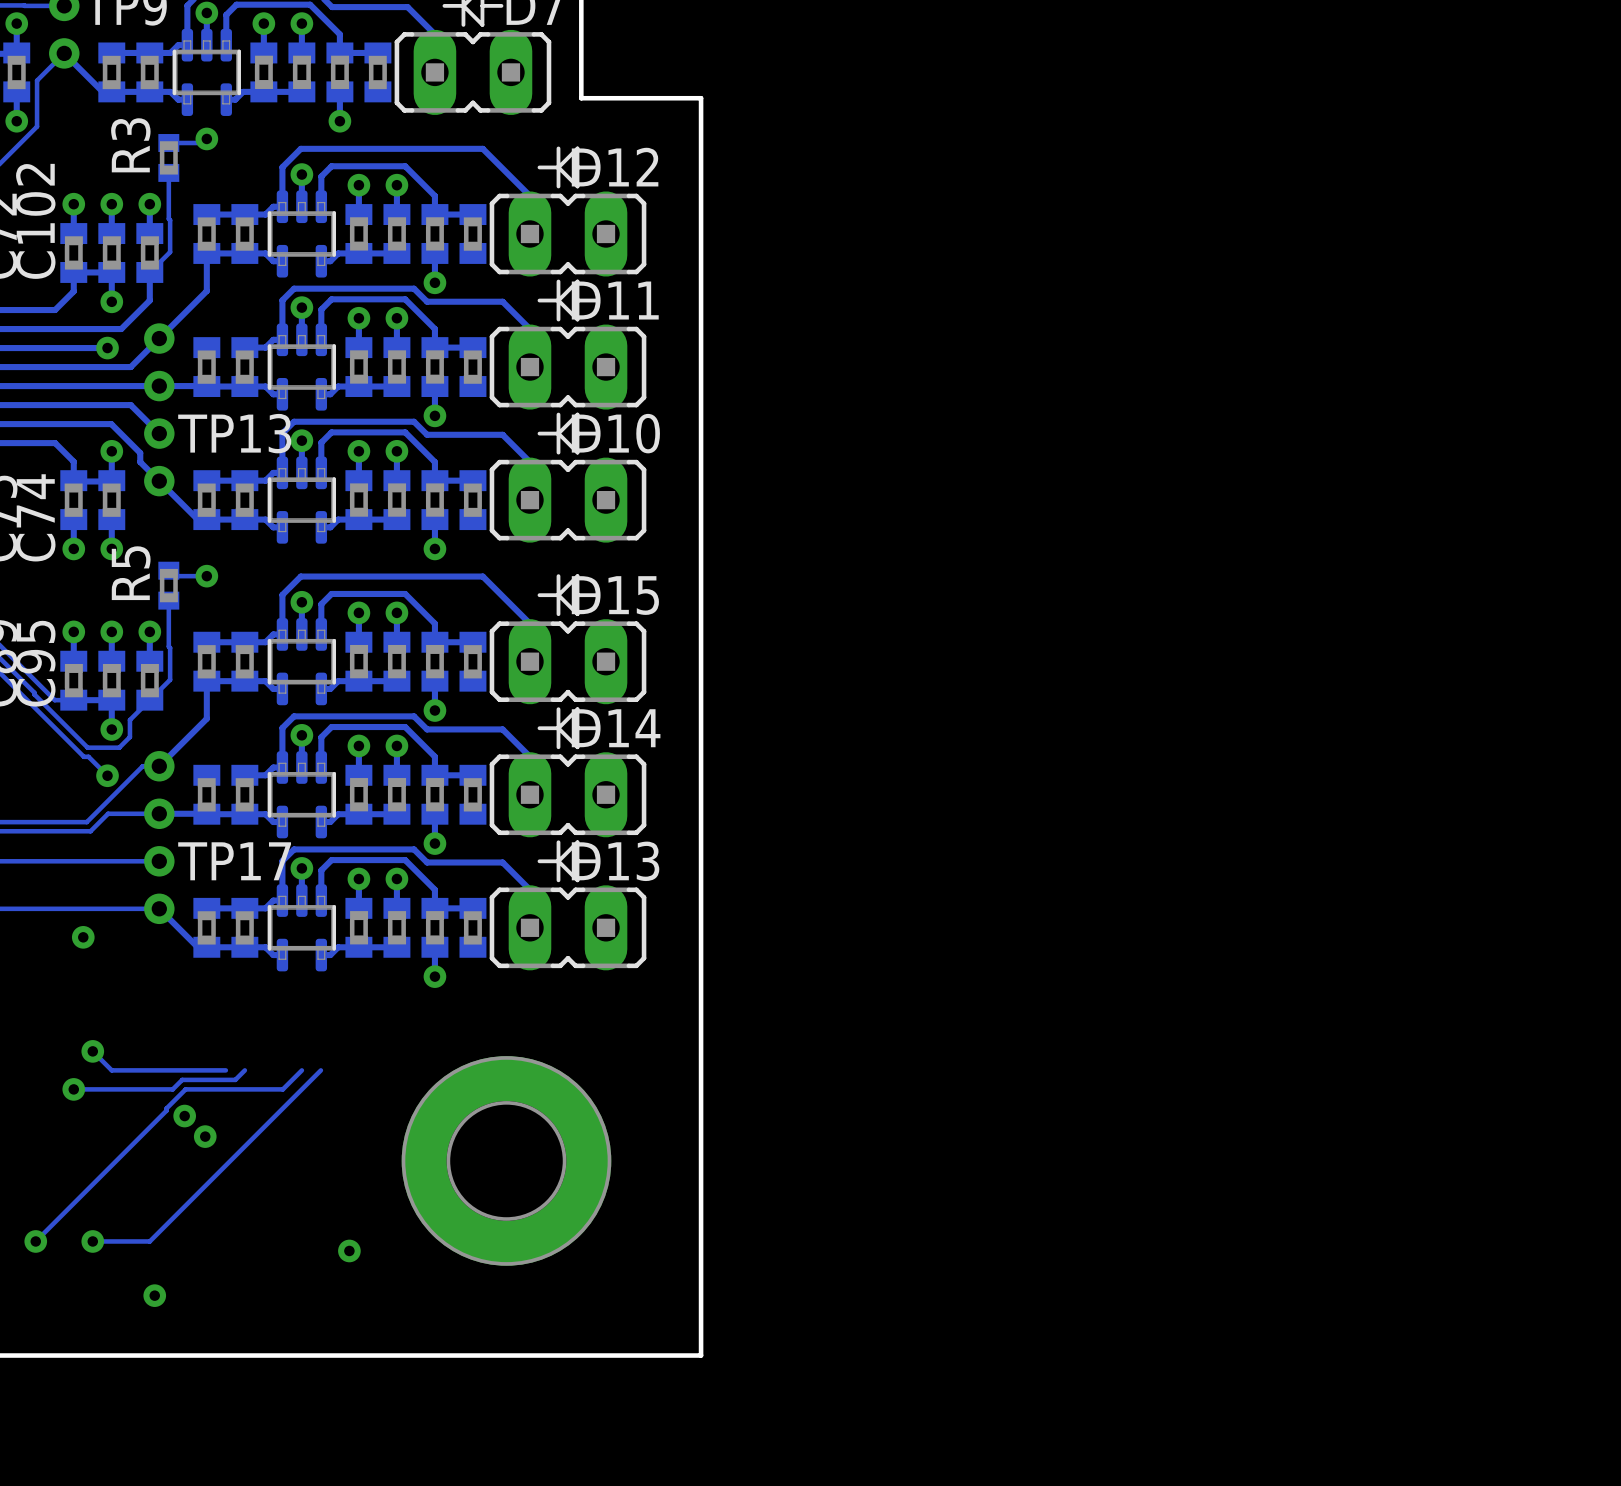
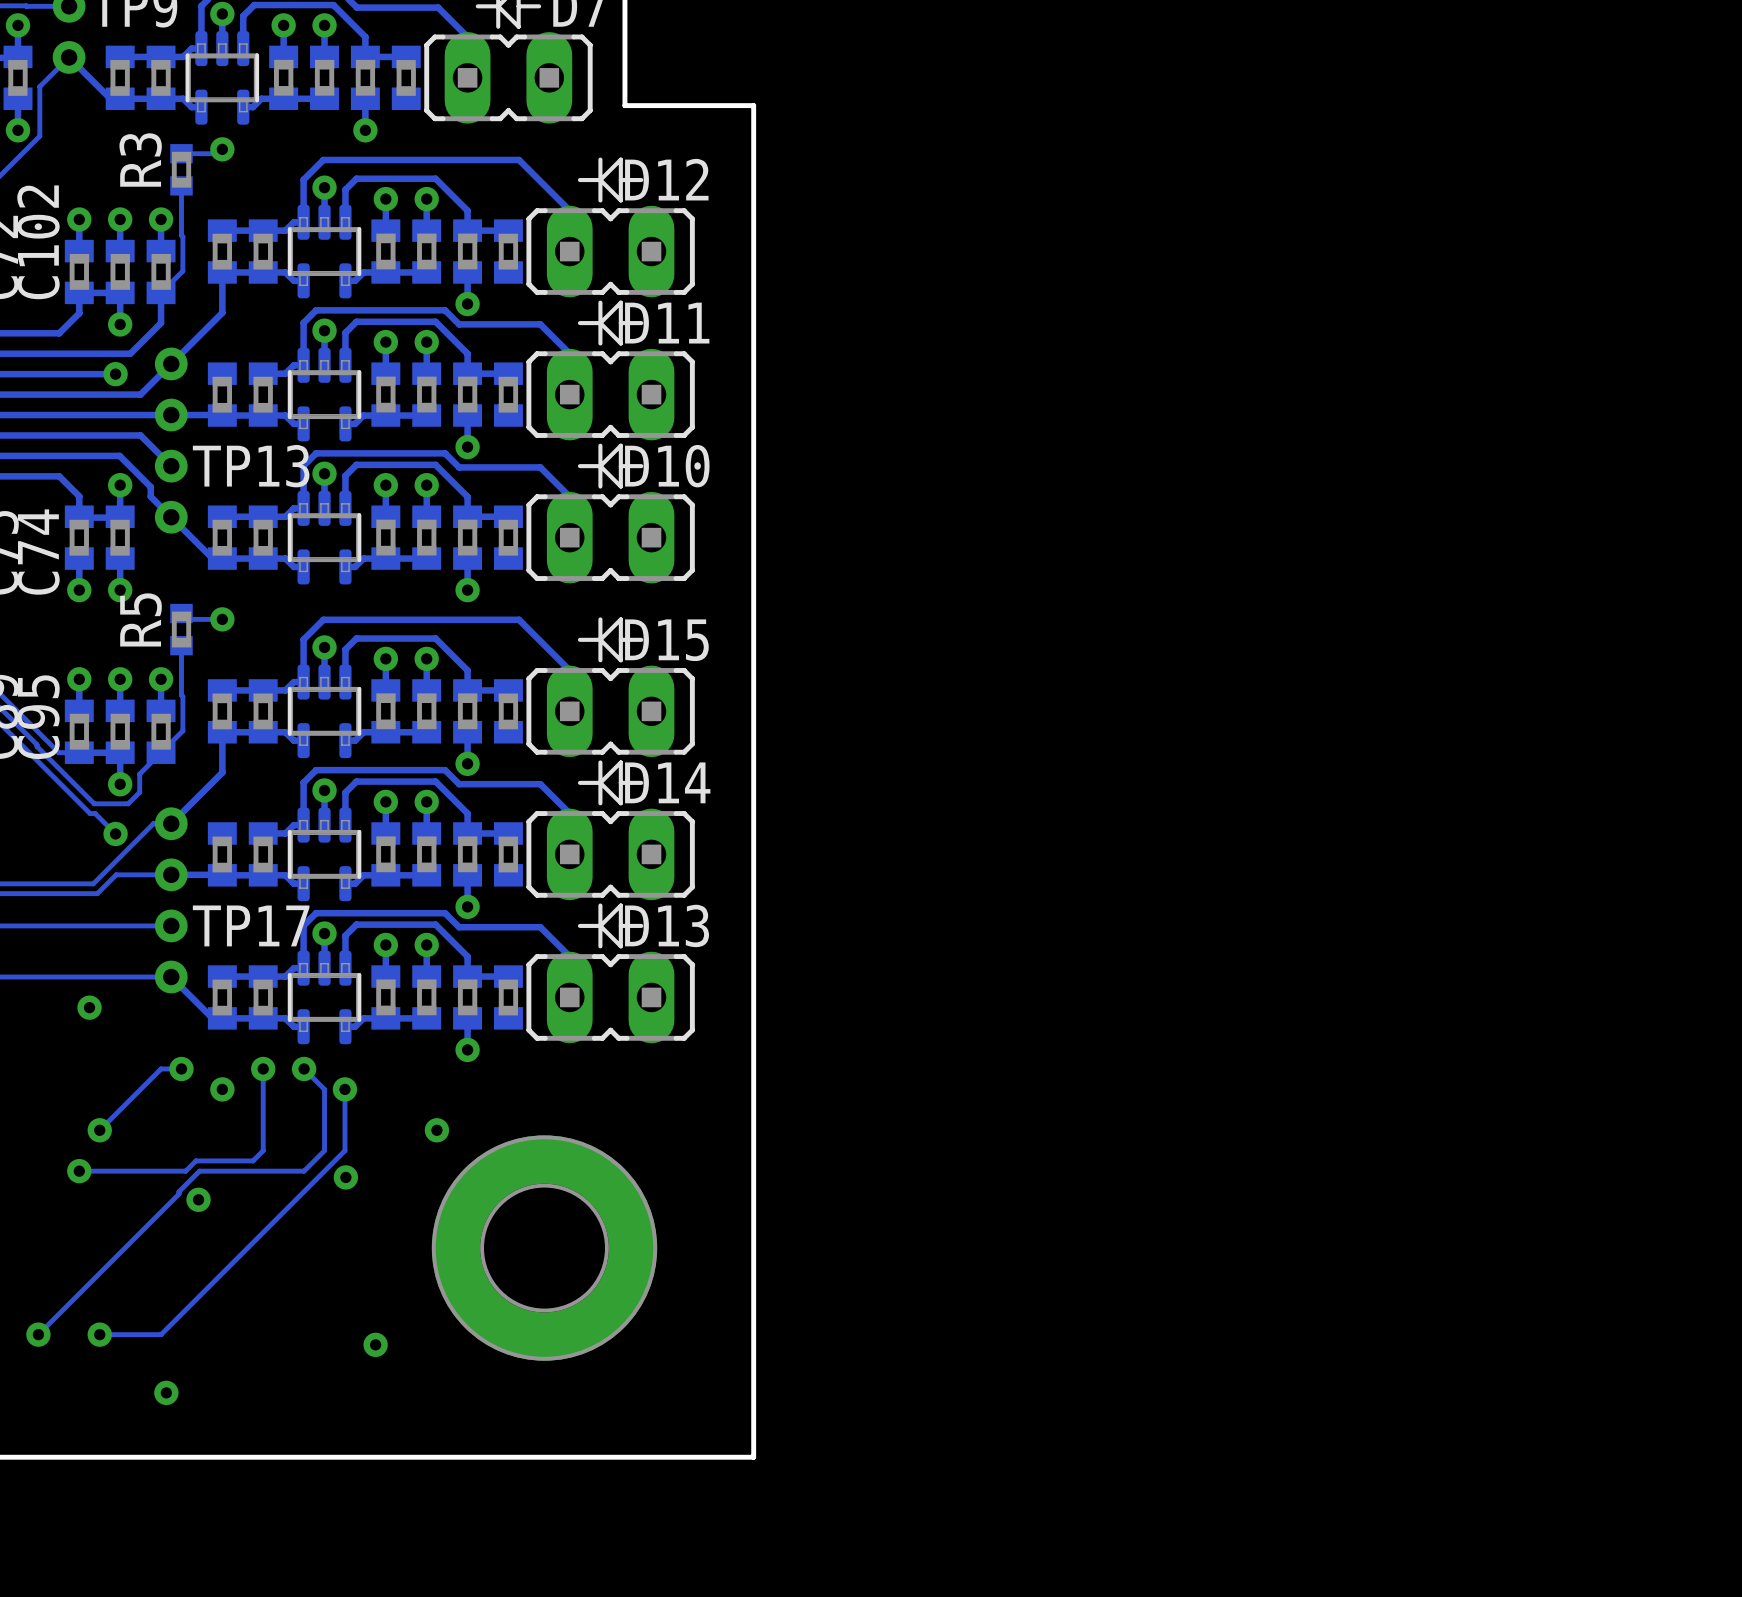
via: none -> (181, 1068)
track: none -> (263, 1068) (263, 1150)
via: none -> (263, 1068)
track: none -> (304, 1068) (324, 1089) (324, 1150)
via: none -> (304, 1068)
via: none -> (222, 1089)
track: none -> (344, 1089) (344, 1150)
via: none -> (344, 1089)
track: (92, 1051) (111, 1070) (225, 1070) -> (99, 1130) (161, 1068) (181, 1068)
via: none -> (436, 1130)
via: none -> (345, 1177)
via: (205, 1136) -> none

